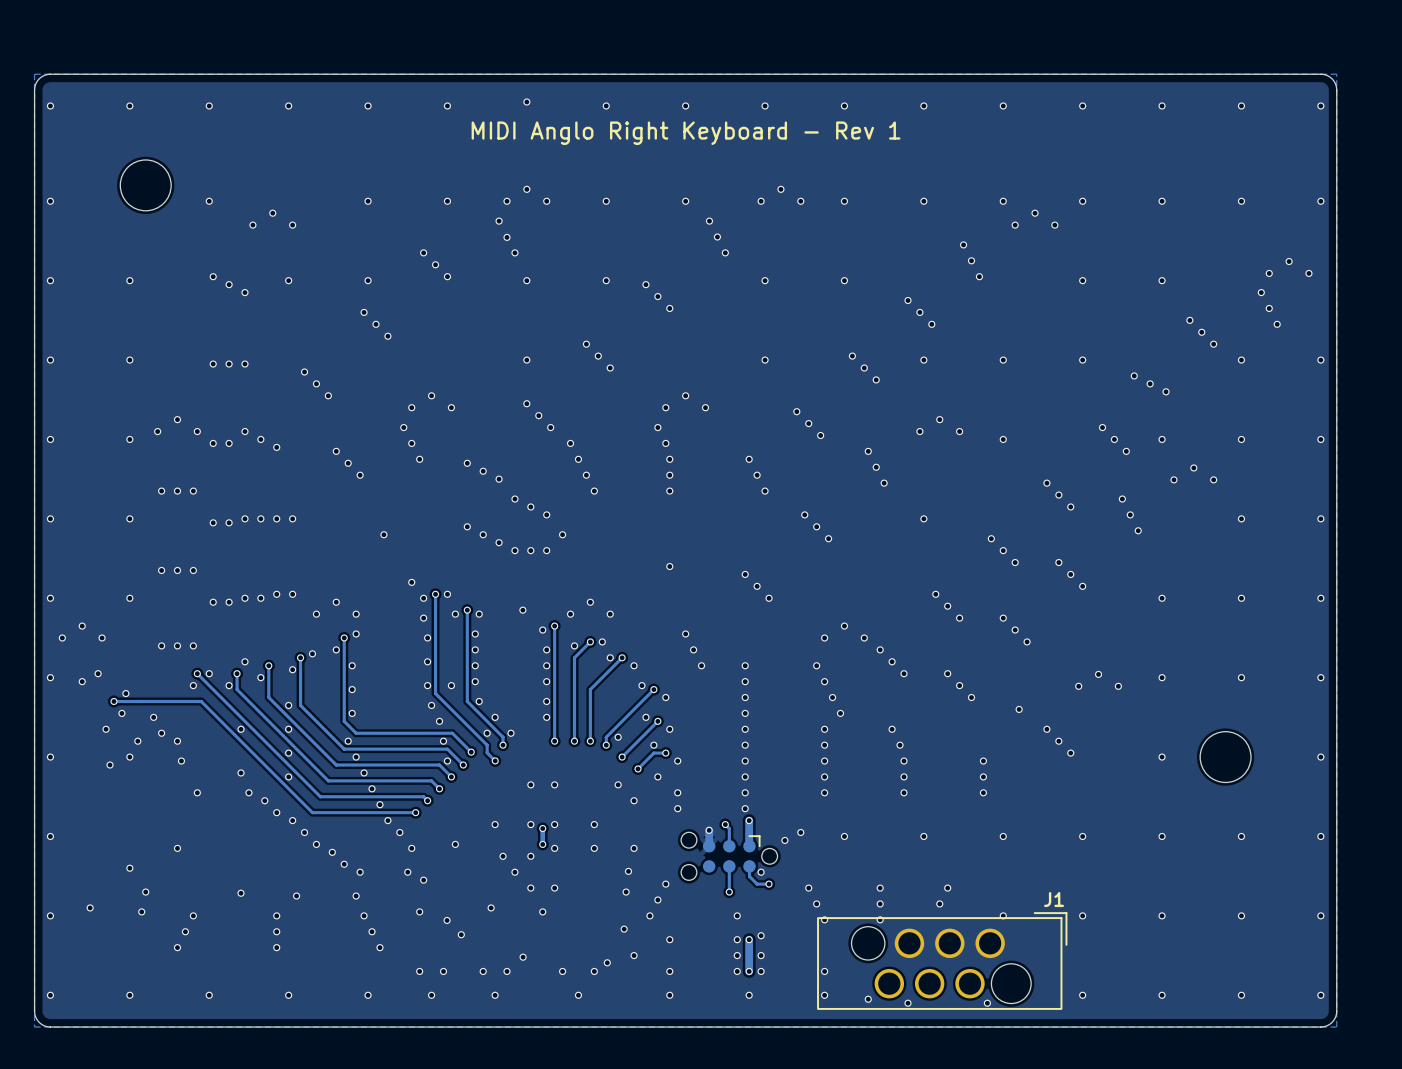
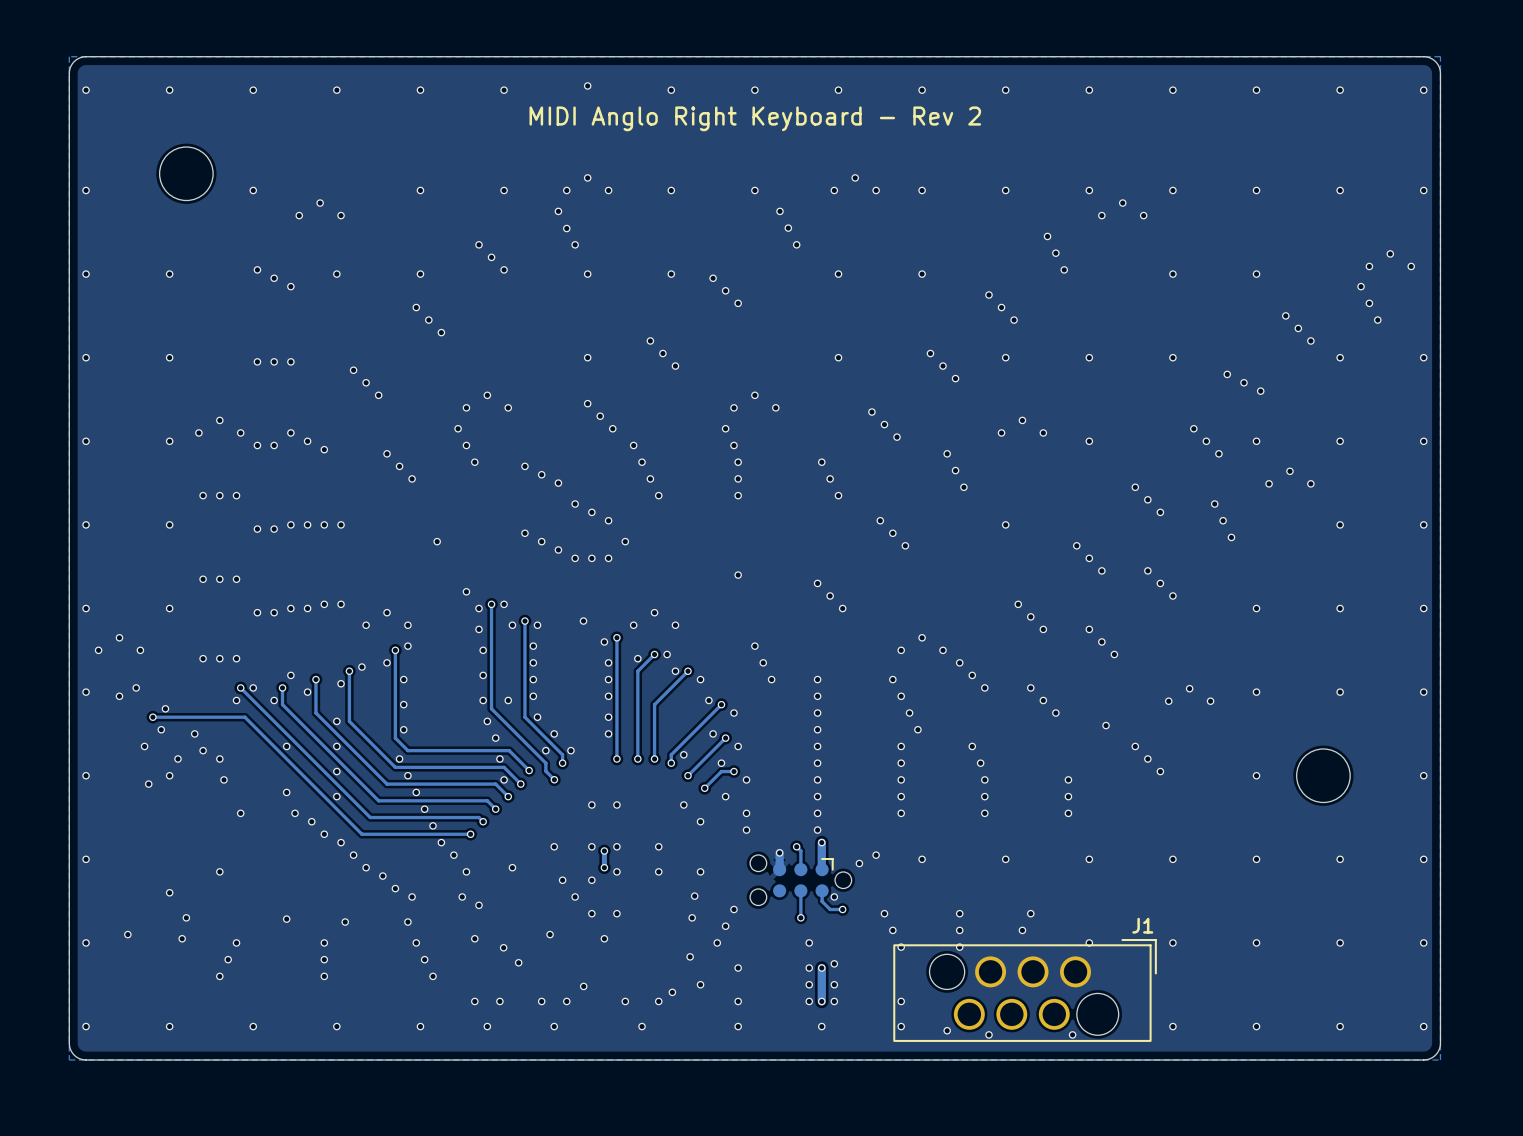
text: MIDI Anglo Right Keyboard - Rev 1 (686, 133) -> MIDI Anglo Right Keyboard - Rev 2 (755, 118)

